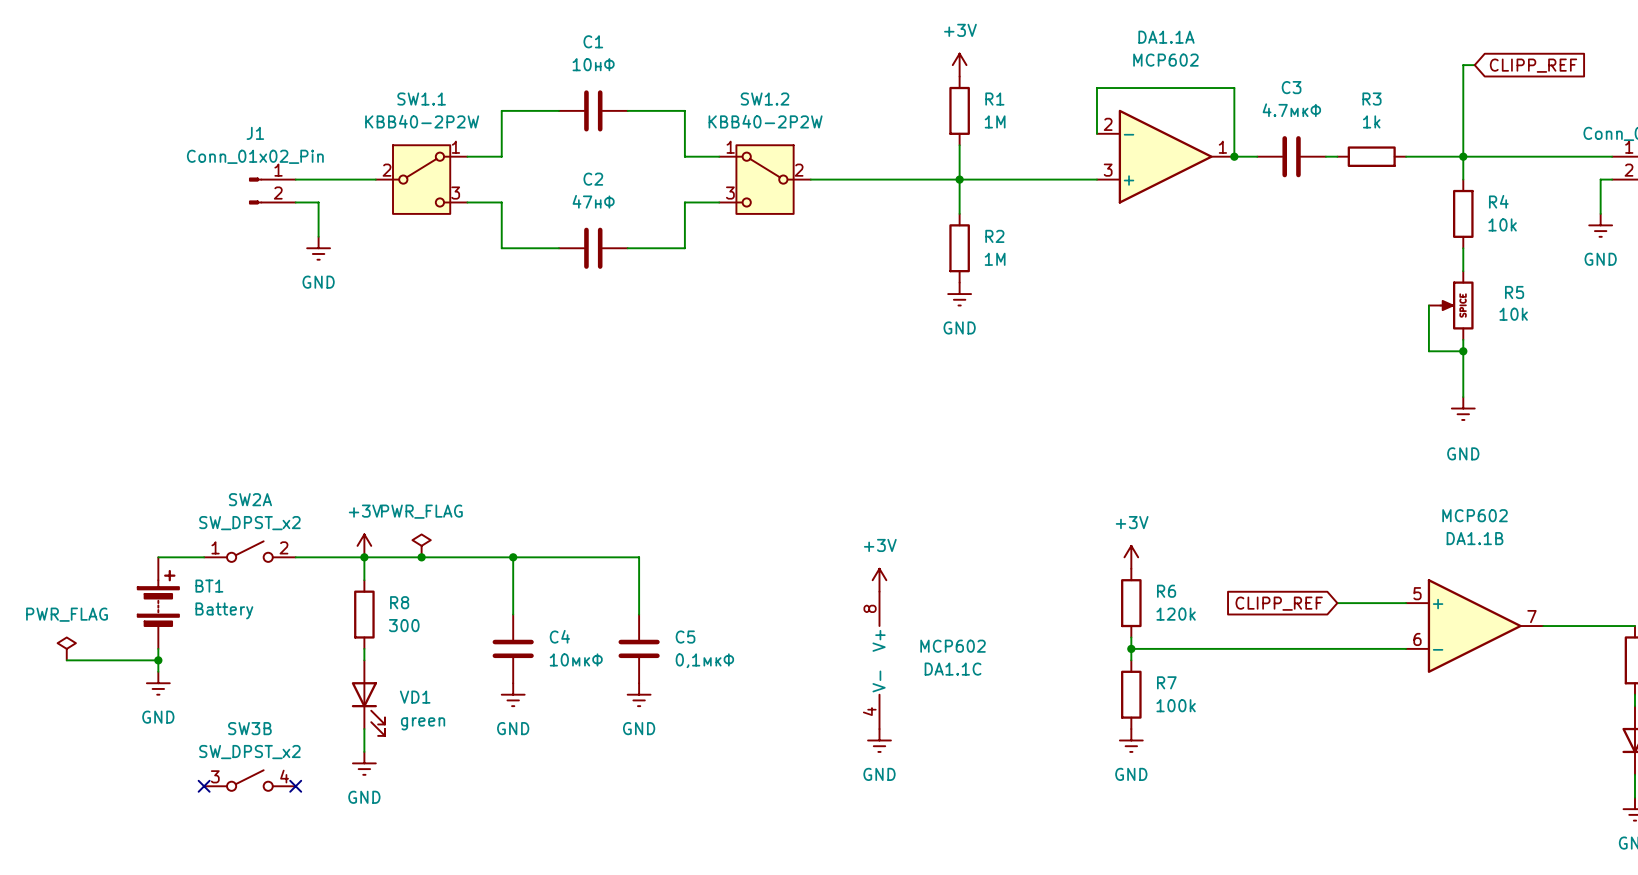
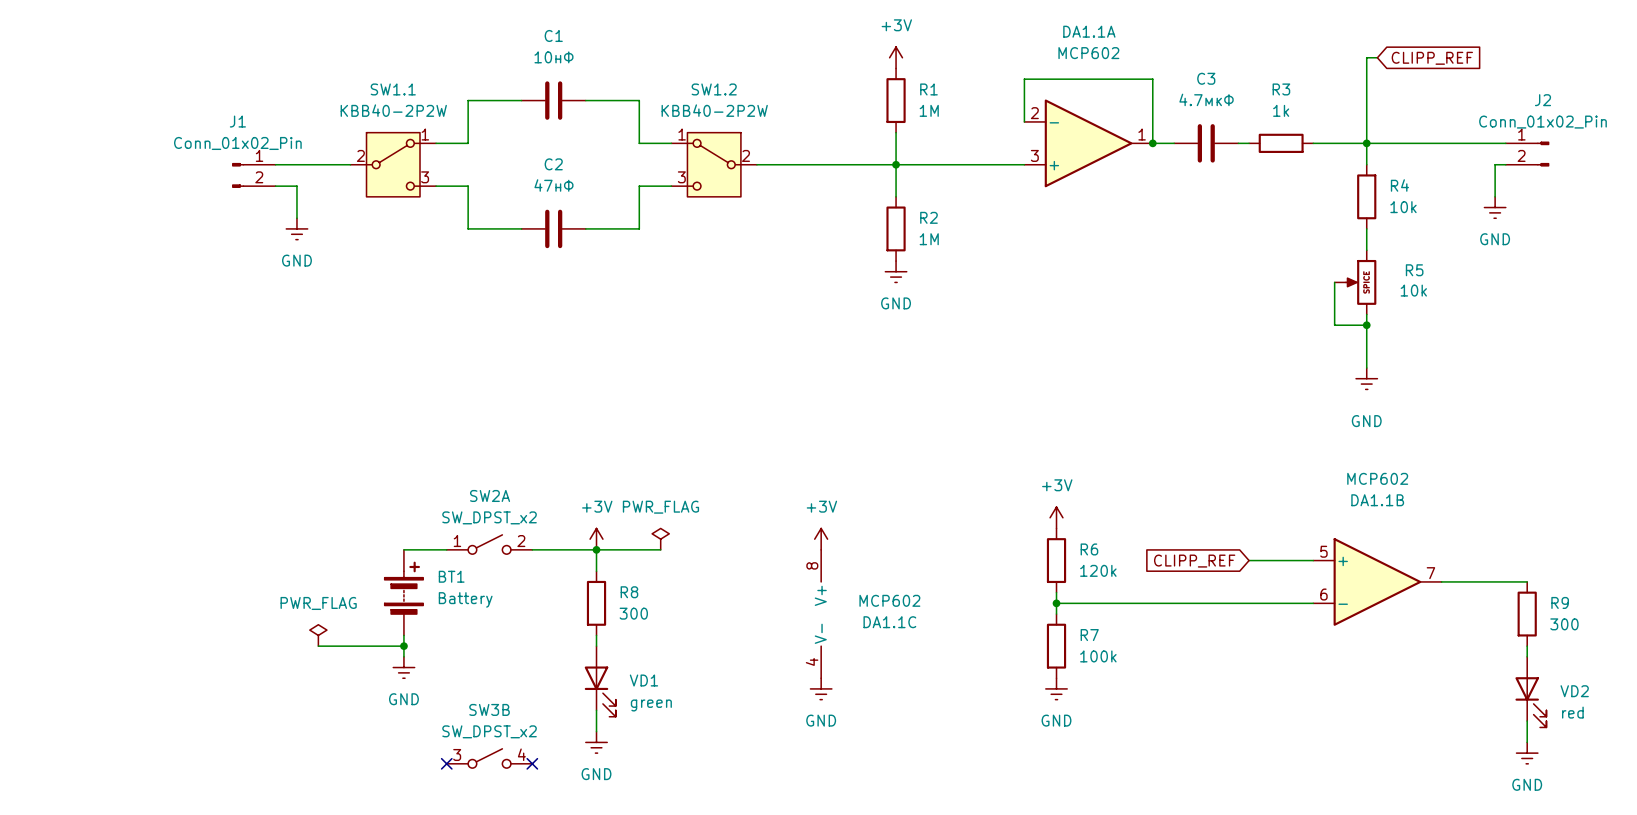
power symbol: +3V (364, 545) -> none
power symbol: PWR_FLAG (421, 545) -> none
SW2A position: (249, 551) -> (489, 544)
wire: (158, 557) (204, 557) -> none
wire: (295, 557) (639, 557) (639, 591) -> none
wire: (364, 557) (364, 580) -> none
junction: (364, 557) -> none
junction: (421, 557) -> none
wire: (513, 557) (513, 614) -> none
junction: (513, 557) -> none
power symbol: none -> +3V (596, 539)
power symbol: none -> PWR_FLAG (660, 539)
wire: none -> (403, 549) (446, 549)
wire: none -> (532, 549) (660, 549)
junction: none -> (596, 549)
BT1 position: (158, 603) -> (403, 592)
R8 position: (364, 614) -> (596, 603)
power symbol: PWR_FLAG (66, 648) -> none
wire: (158, 648) (158, 671) -> none
wire: (364, 648) (364, 660) -> none
C4: 10мкФ (513, 648) -> none
C5: 0,1мкФ (639, 648) -> none
wire: (66, 660) (158, 660) -> none
junction: (158, 660) -> none
power symbol: GND (158, 683) -> none
power symbol: none -> PWR_FLAG (318, 635)
wire: none -> (318, 646) (403, 646)
junction: none -> (403, 646)
power symbol: GND (513, 694) -> none
power symbol: GND (639, 694) -> none
VD1 position: (368, 698) -> (600, 681)
power symbol: none -> GND (403, 667)
wire: (364, 729) (364, 751) -> (403, 635) (403, 656)
power symbol: GND (364, 763) -> none
wire: none -> (596, 710) (596, 731)
SW3B position: (249, 780) -> (489, 758)
no-connect mark: (204, 786) -> none
no-connect mark: (295, 786) -> none
power symbol: none -> GND (596, 742)
no-connect mark: none -> (446, 763)
no-connect mark: none -> (532, 763)

